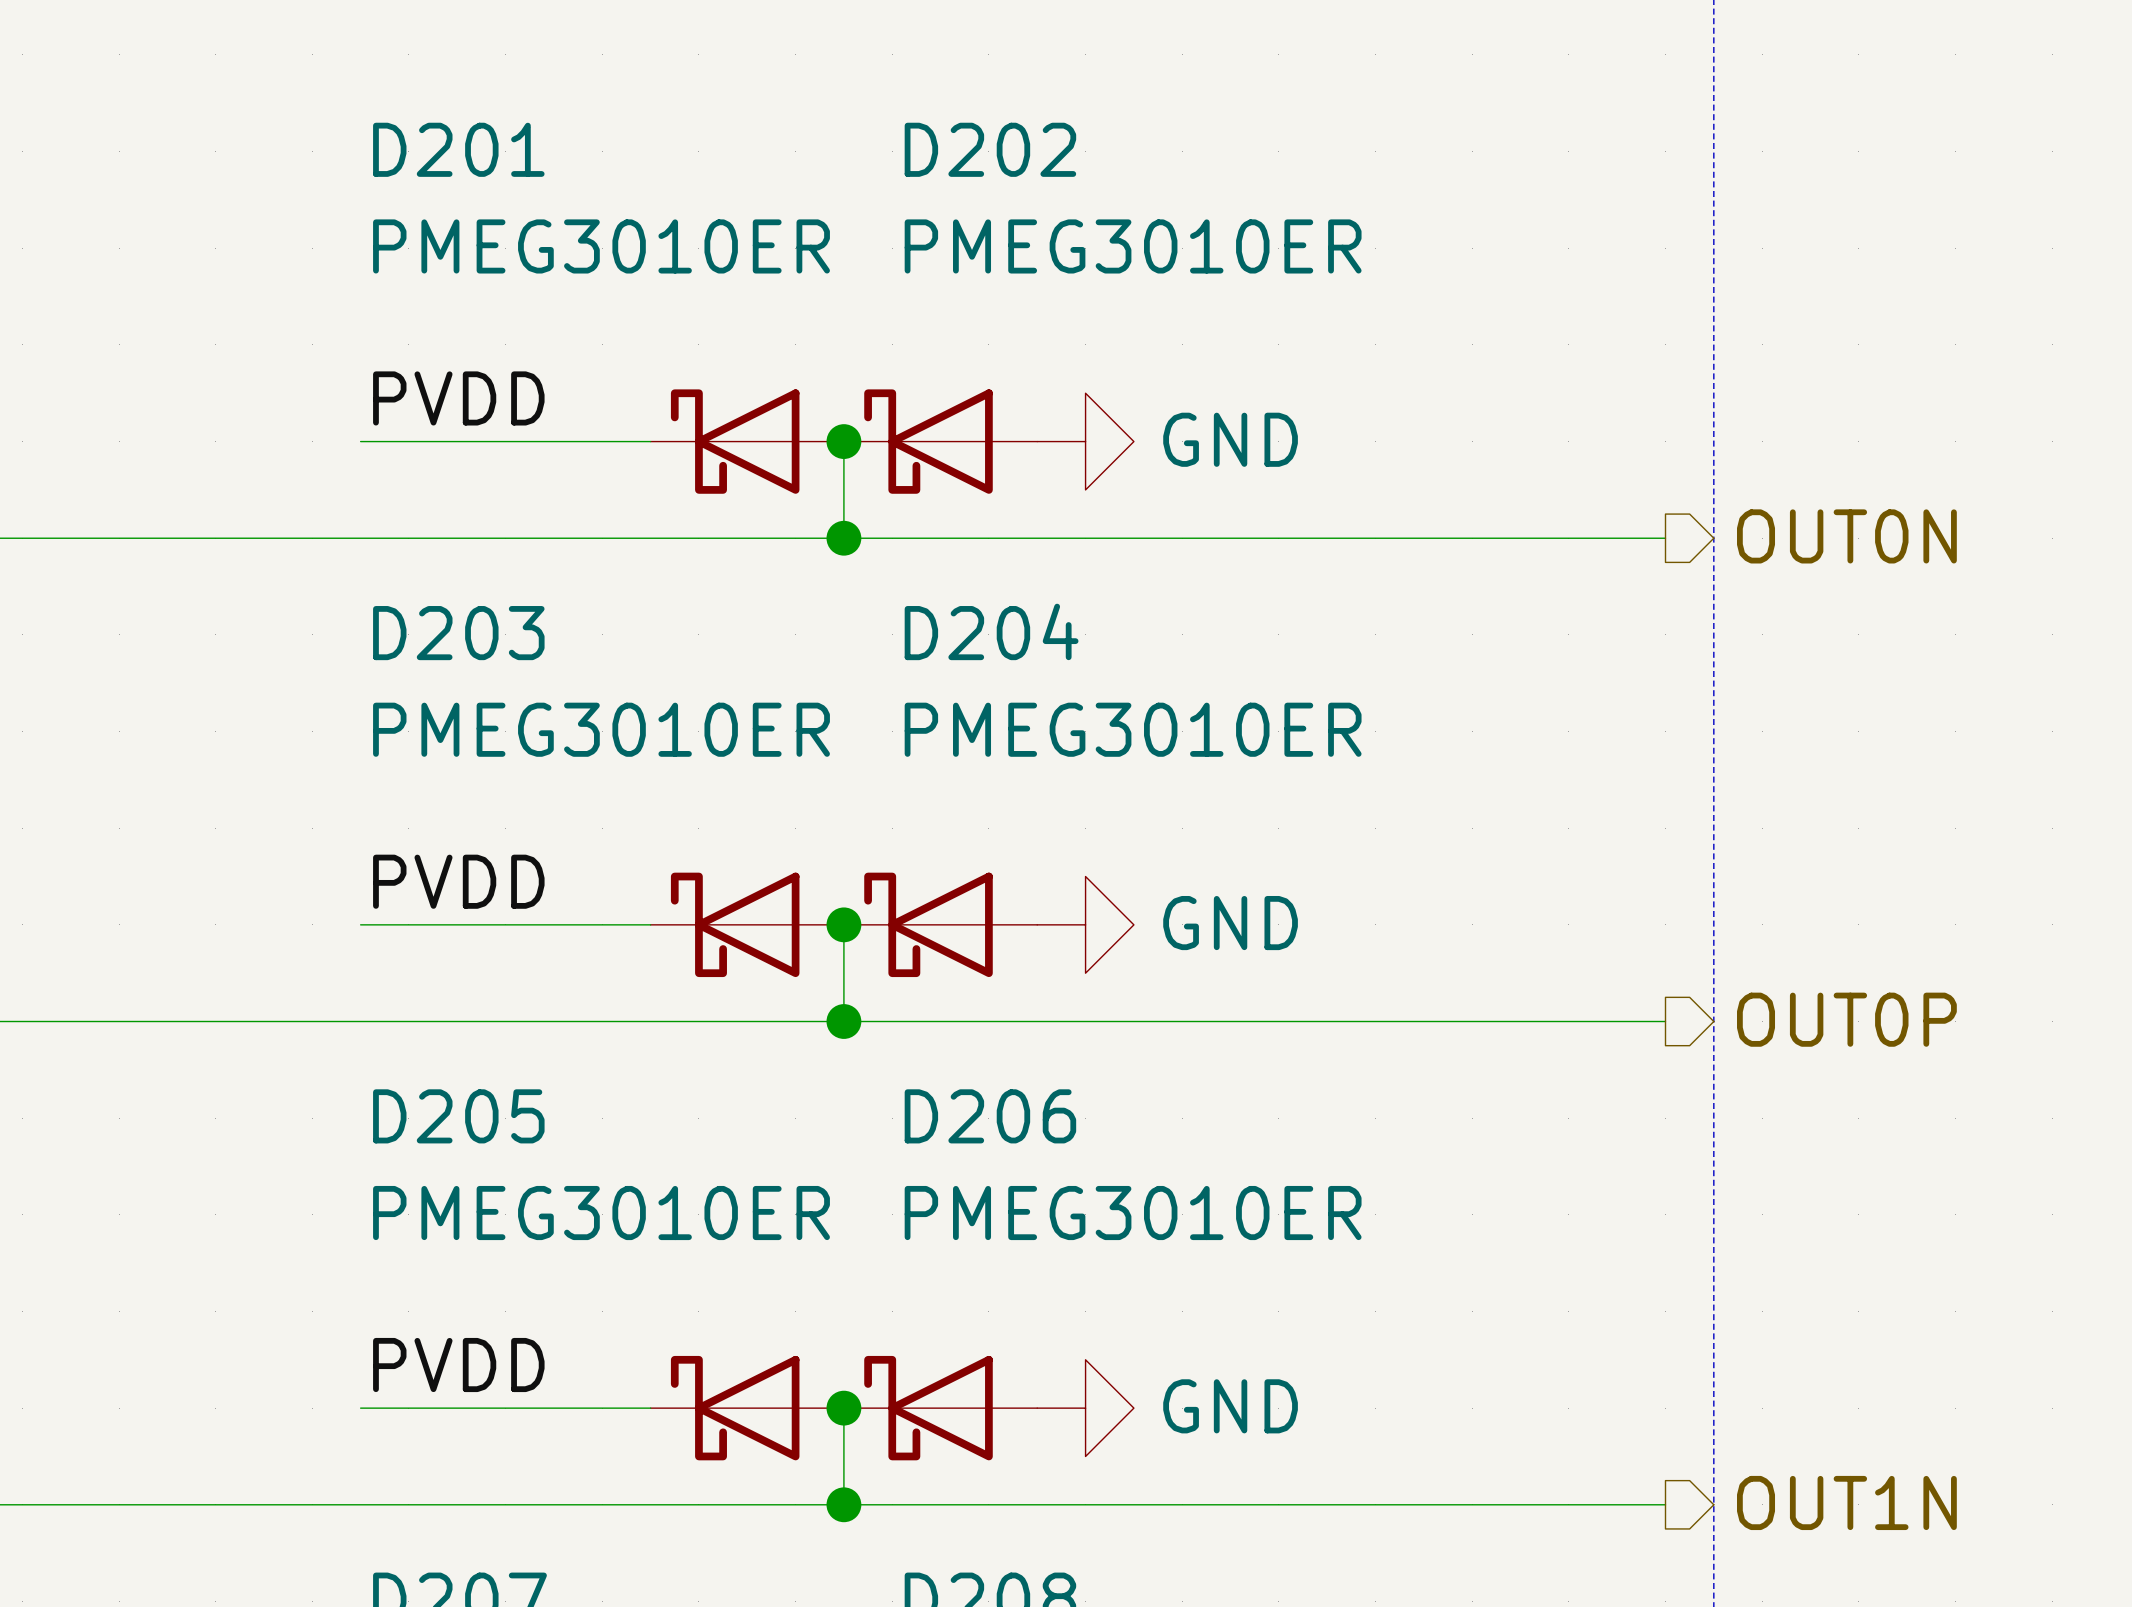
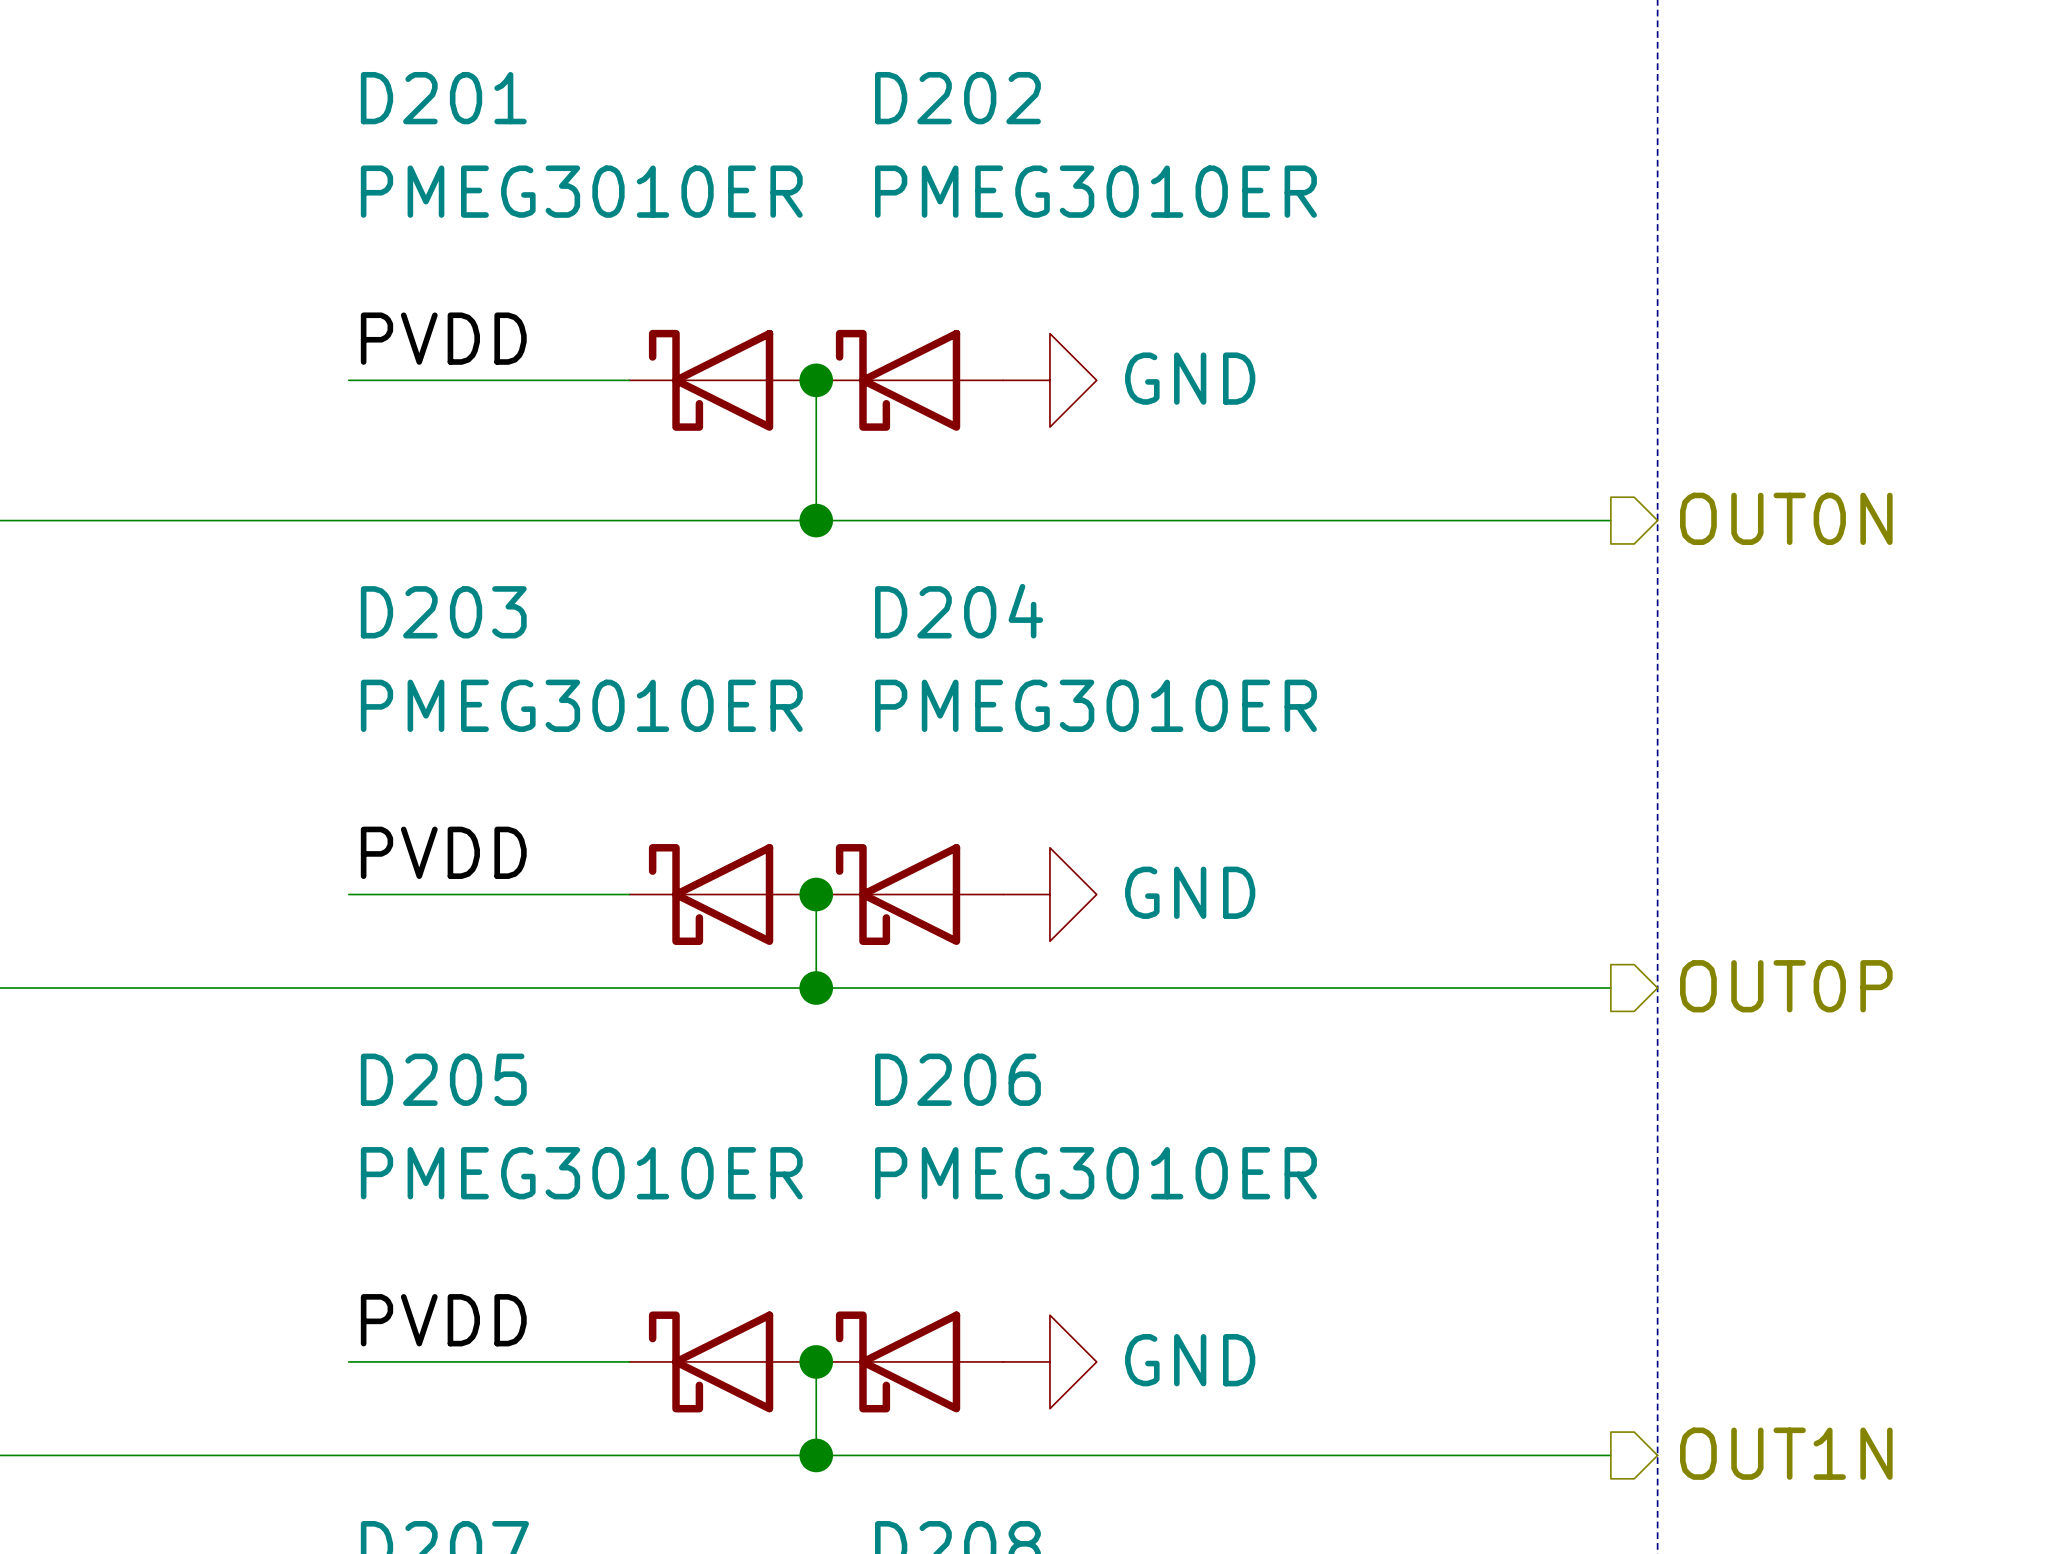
wire: none -> (816, 380) (816, 427)
label position: PVDD (458, 398) -> PVDD (443, 338)
wire: (360, 441) (650, 441) -> (348, 380) (629, 380)
D201 position: (747, 441) -> (722, 380)
junction position: (843, 441) -> (816, 380)
D202 position: (940, 441) -> (909, 380)
power symbol position: GND (1085, 441) -> GND (1049, 380)

